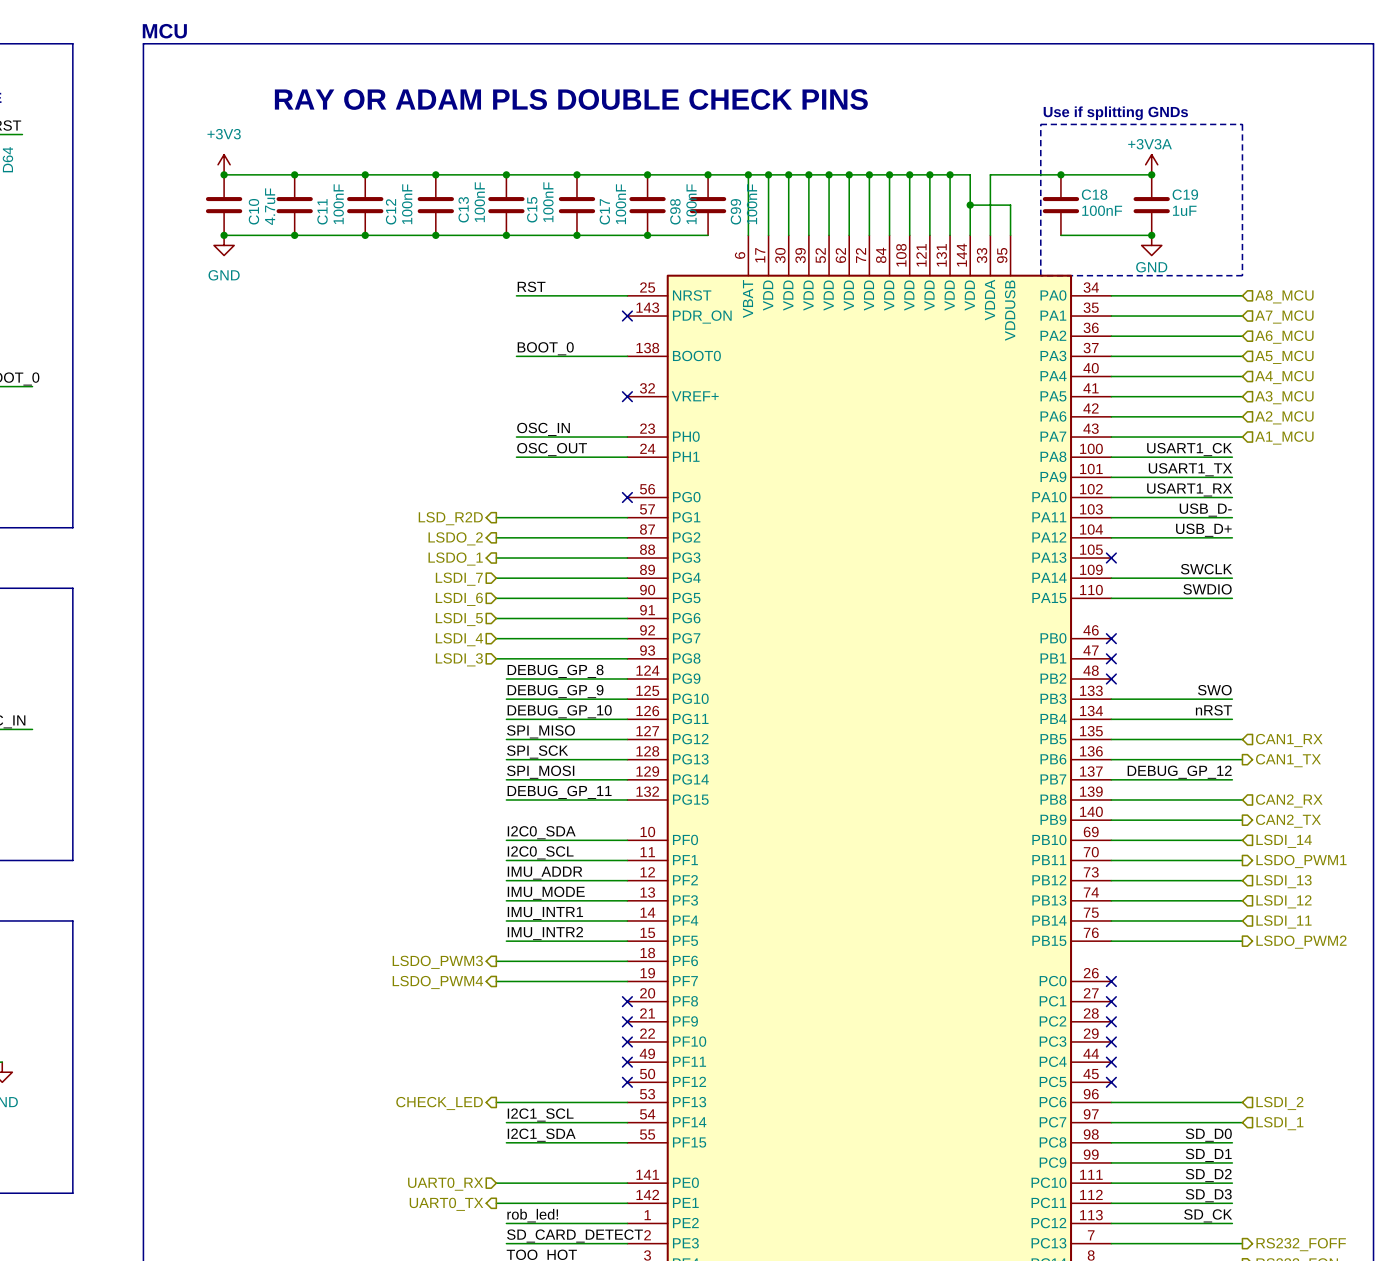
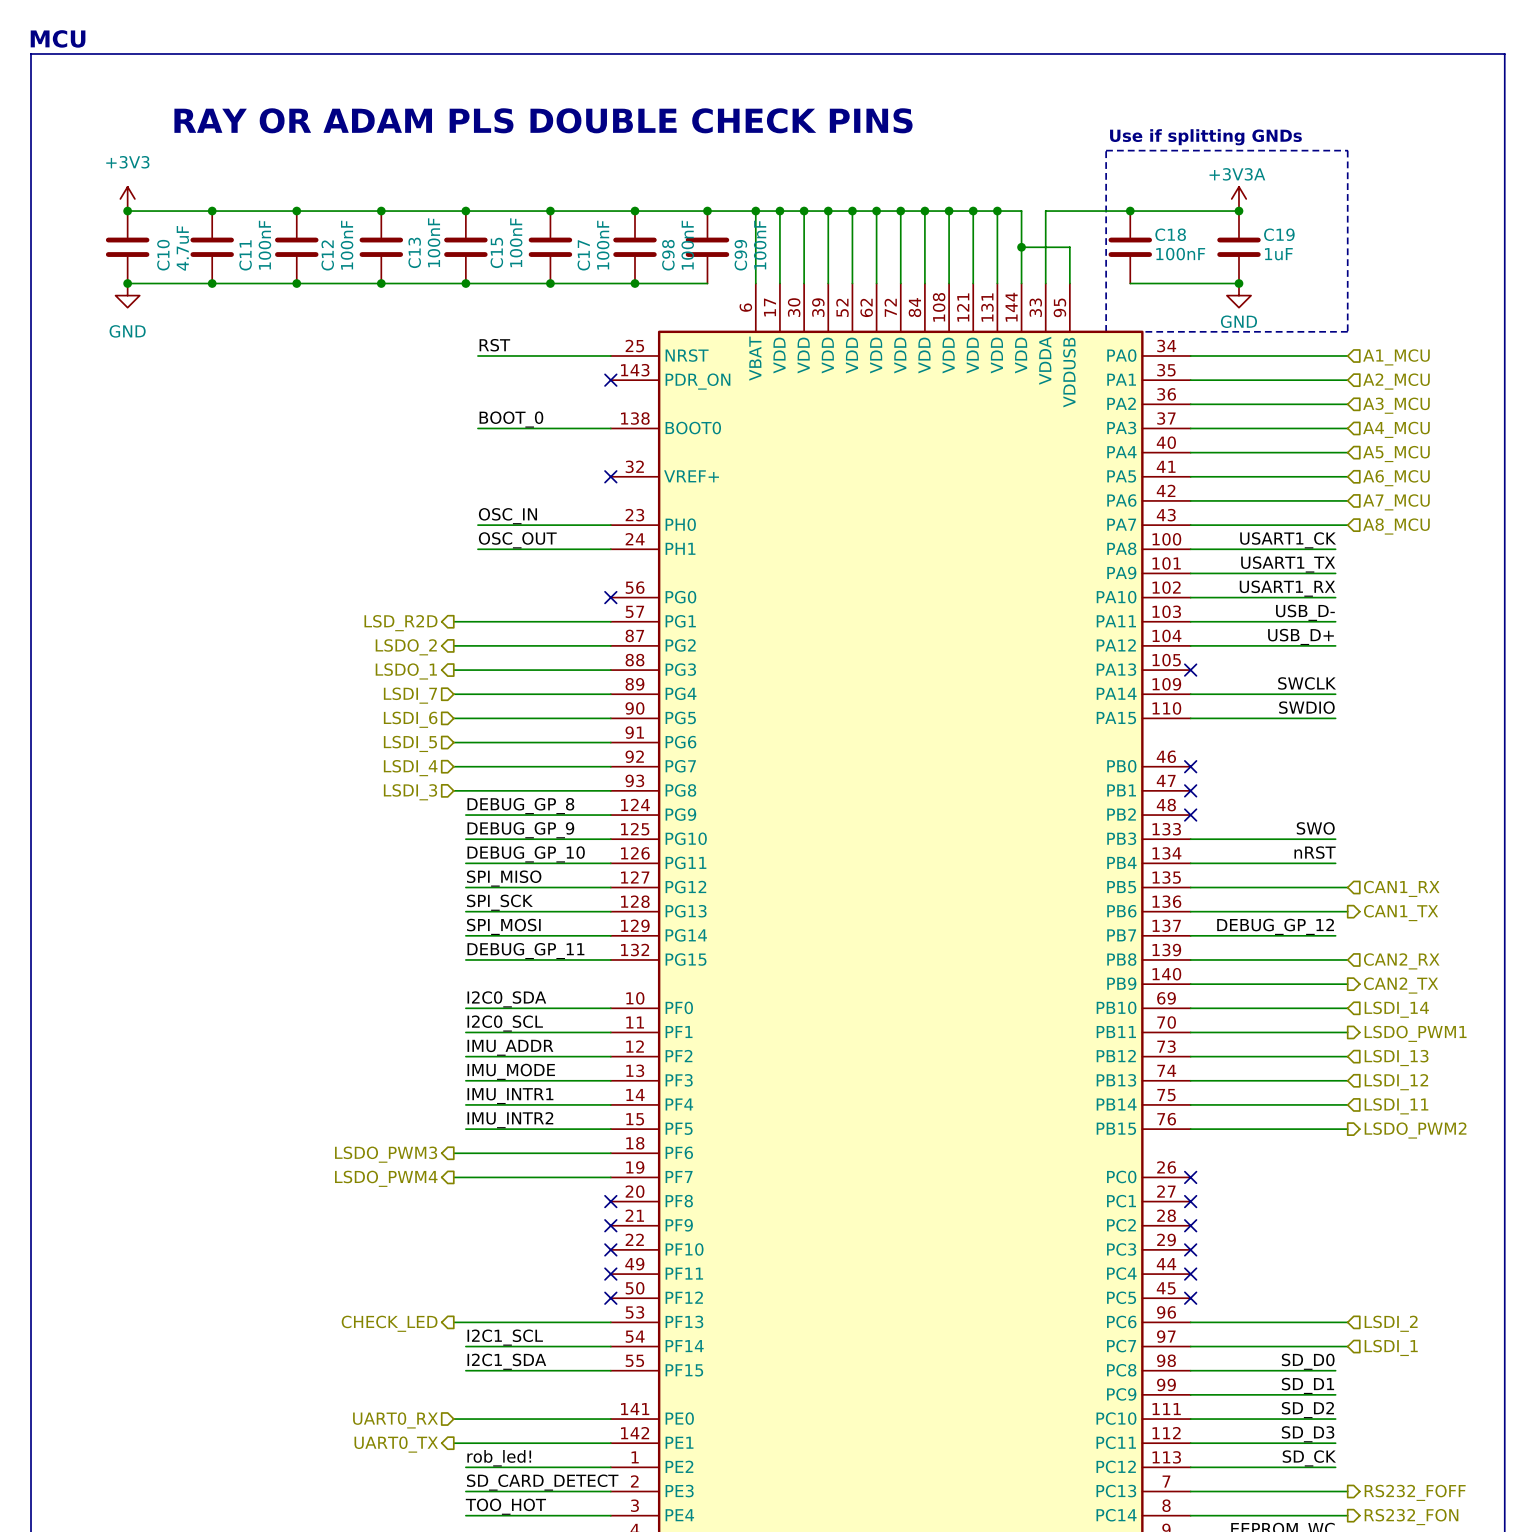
hierarchical label: A8_MCU (1284, 296) -> A1_MCU (1396, 357)
hierarchical label: A7_MCU (1284, 317) -> A2_MCU (1396, 381)
hierarchical label: A6_MCU (1284, 337) -> A3_MCU (1396, 405)
hierarchical label: A5_MCU (1284, 357) -> A4_MCU (1396, 429)
hierarchical label: A4_MCU (1284, 377) -> A5_MCU (1396, 454)
hierarchical label: A3_MCU (1284, 397) -> A6_MCU (1396, 478)
hierarchical label: A2_MCU (1284, 417) -> A7_MCU (1396, 502)
hierarchical label: A1_MCU (1284, 438) -> A8_MCU (1396, 526)

